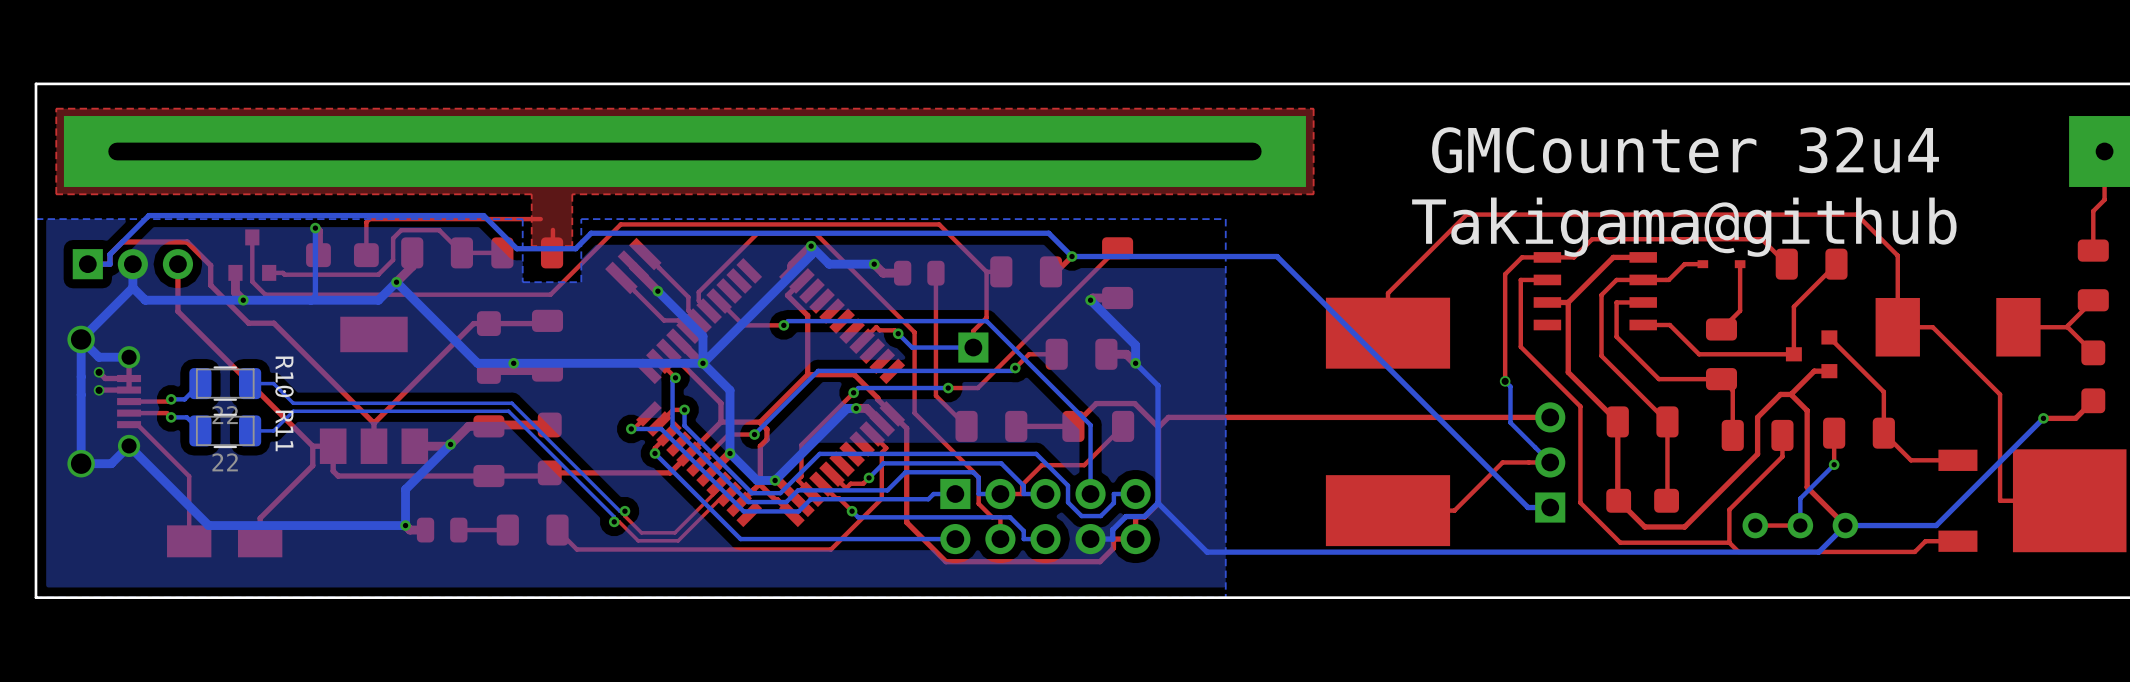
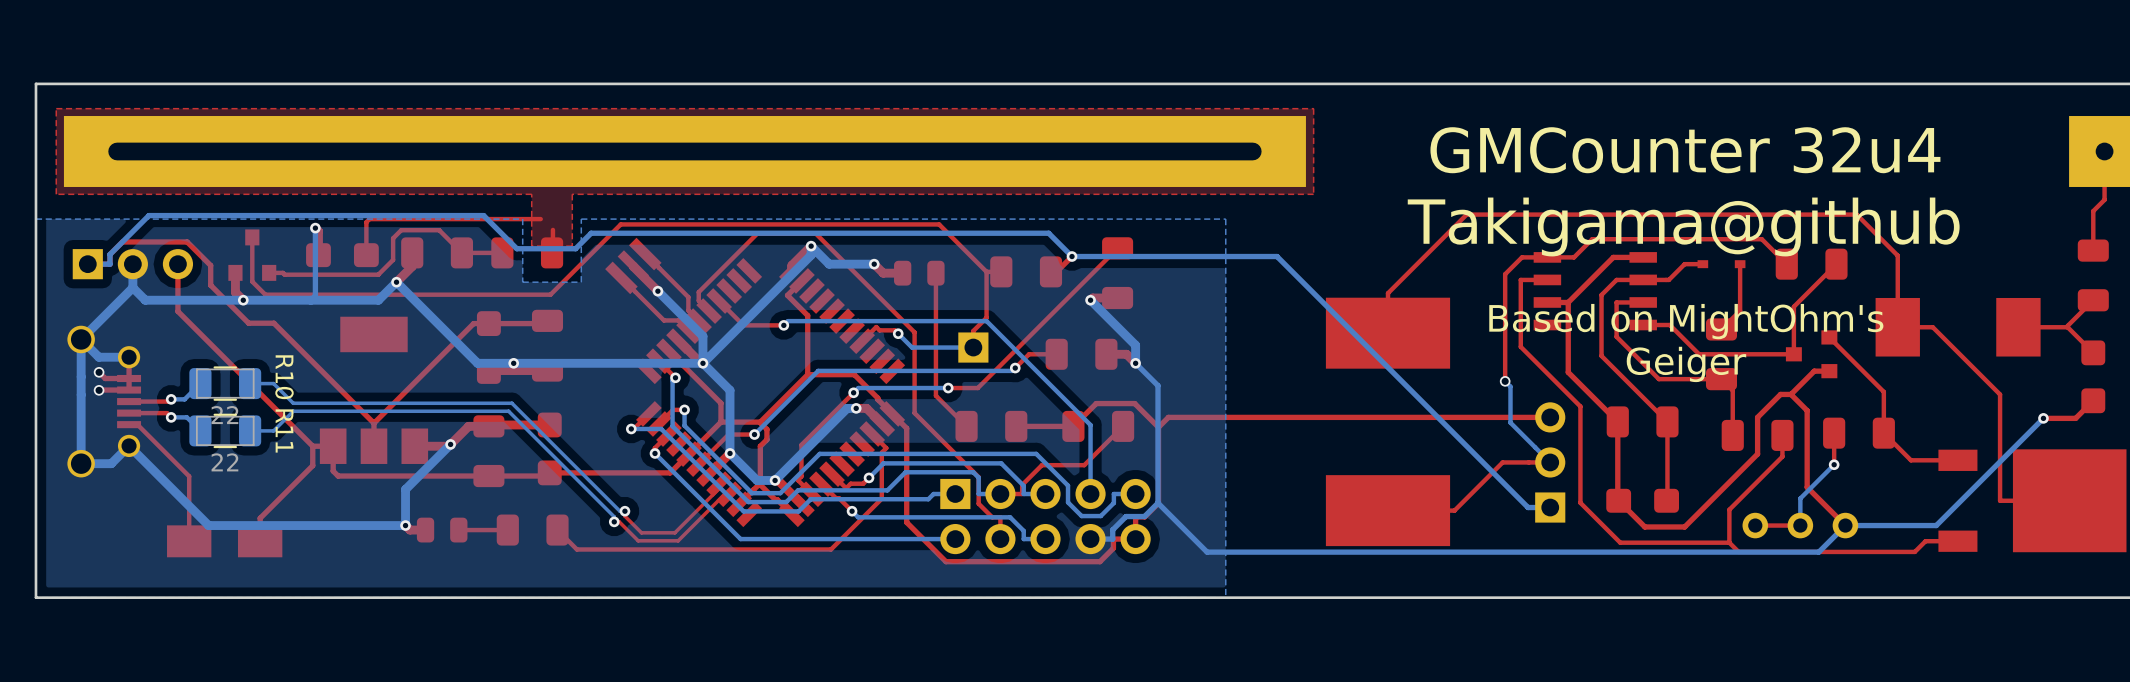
text: none -> Based on MightOhm's (1686, 321)
text: none -> Geiger (1686, 364)

